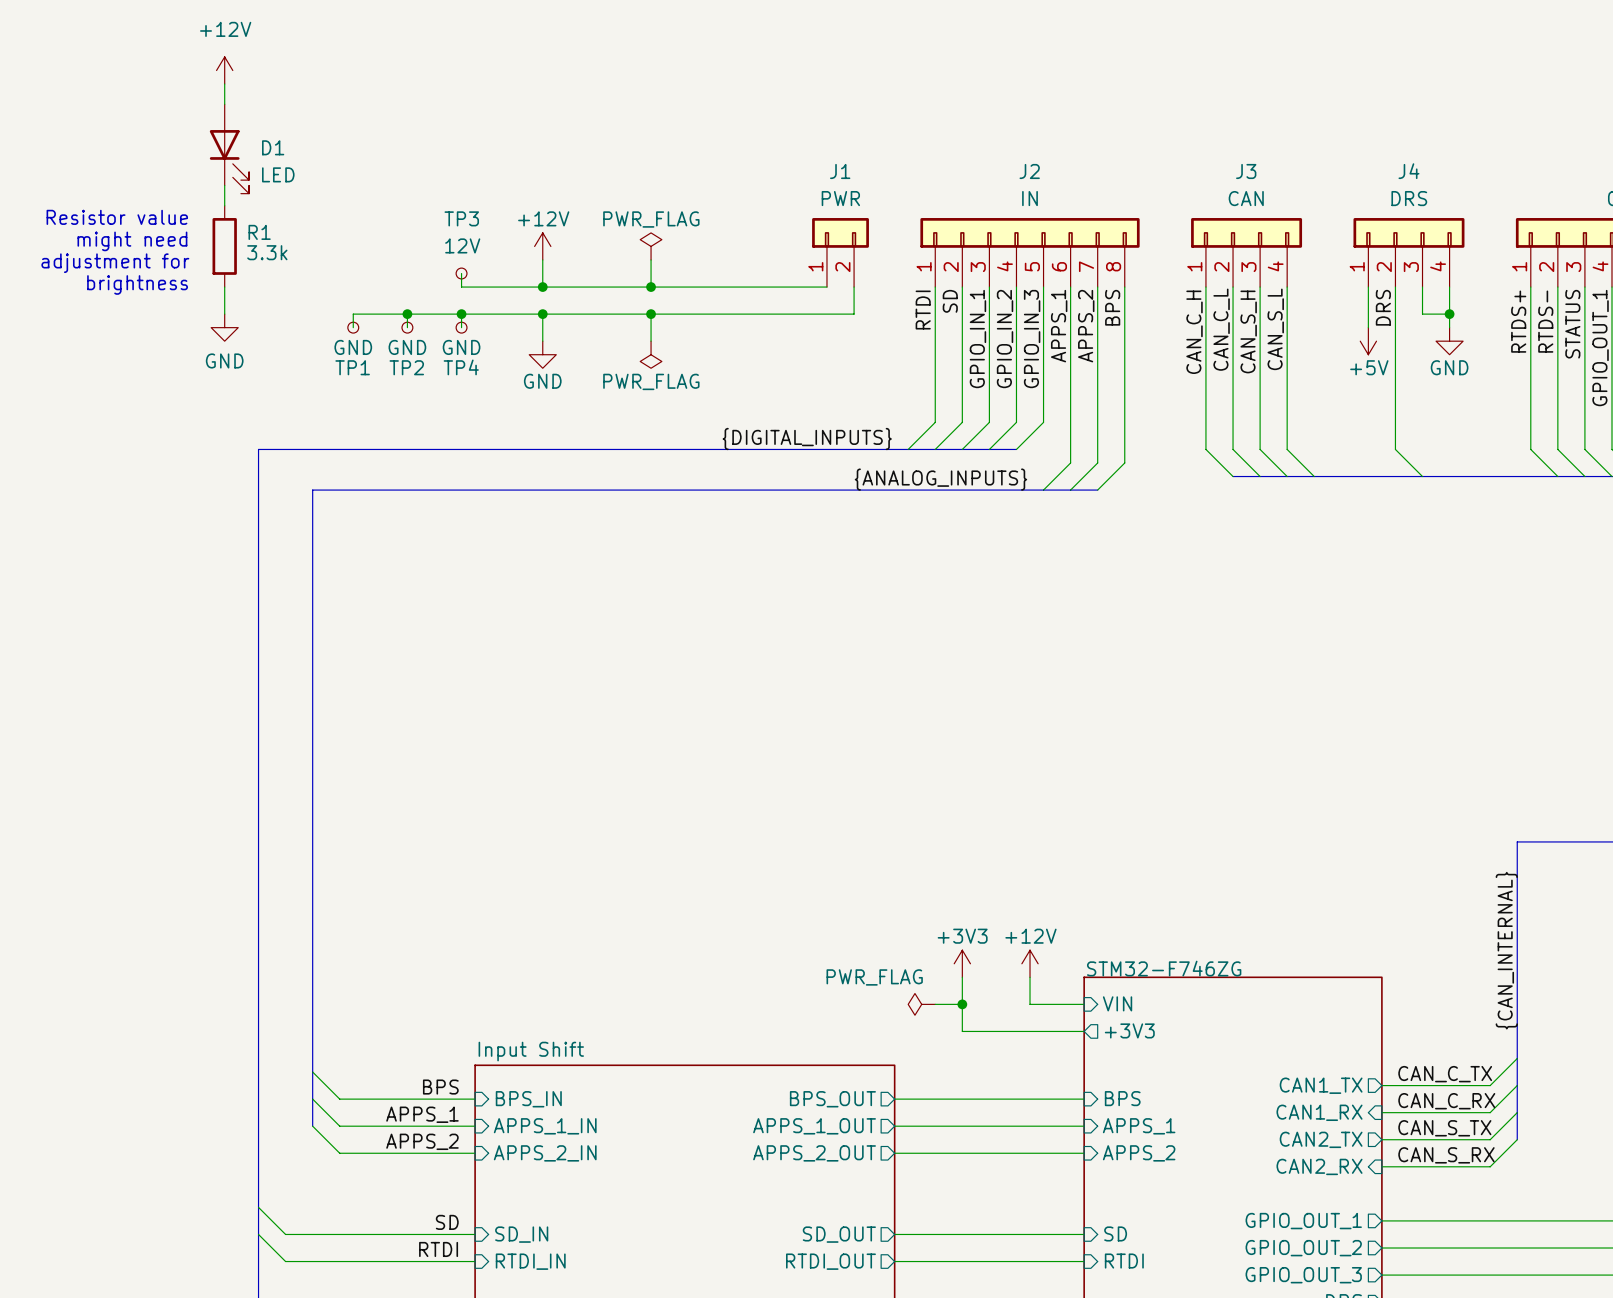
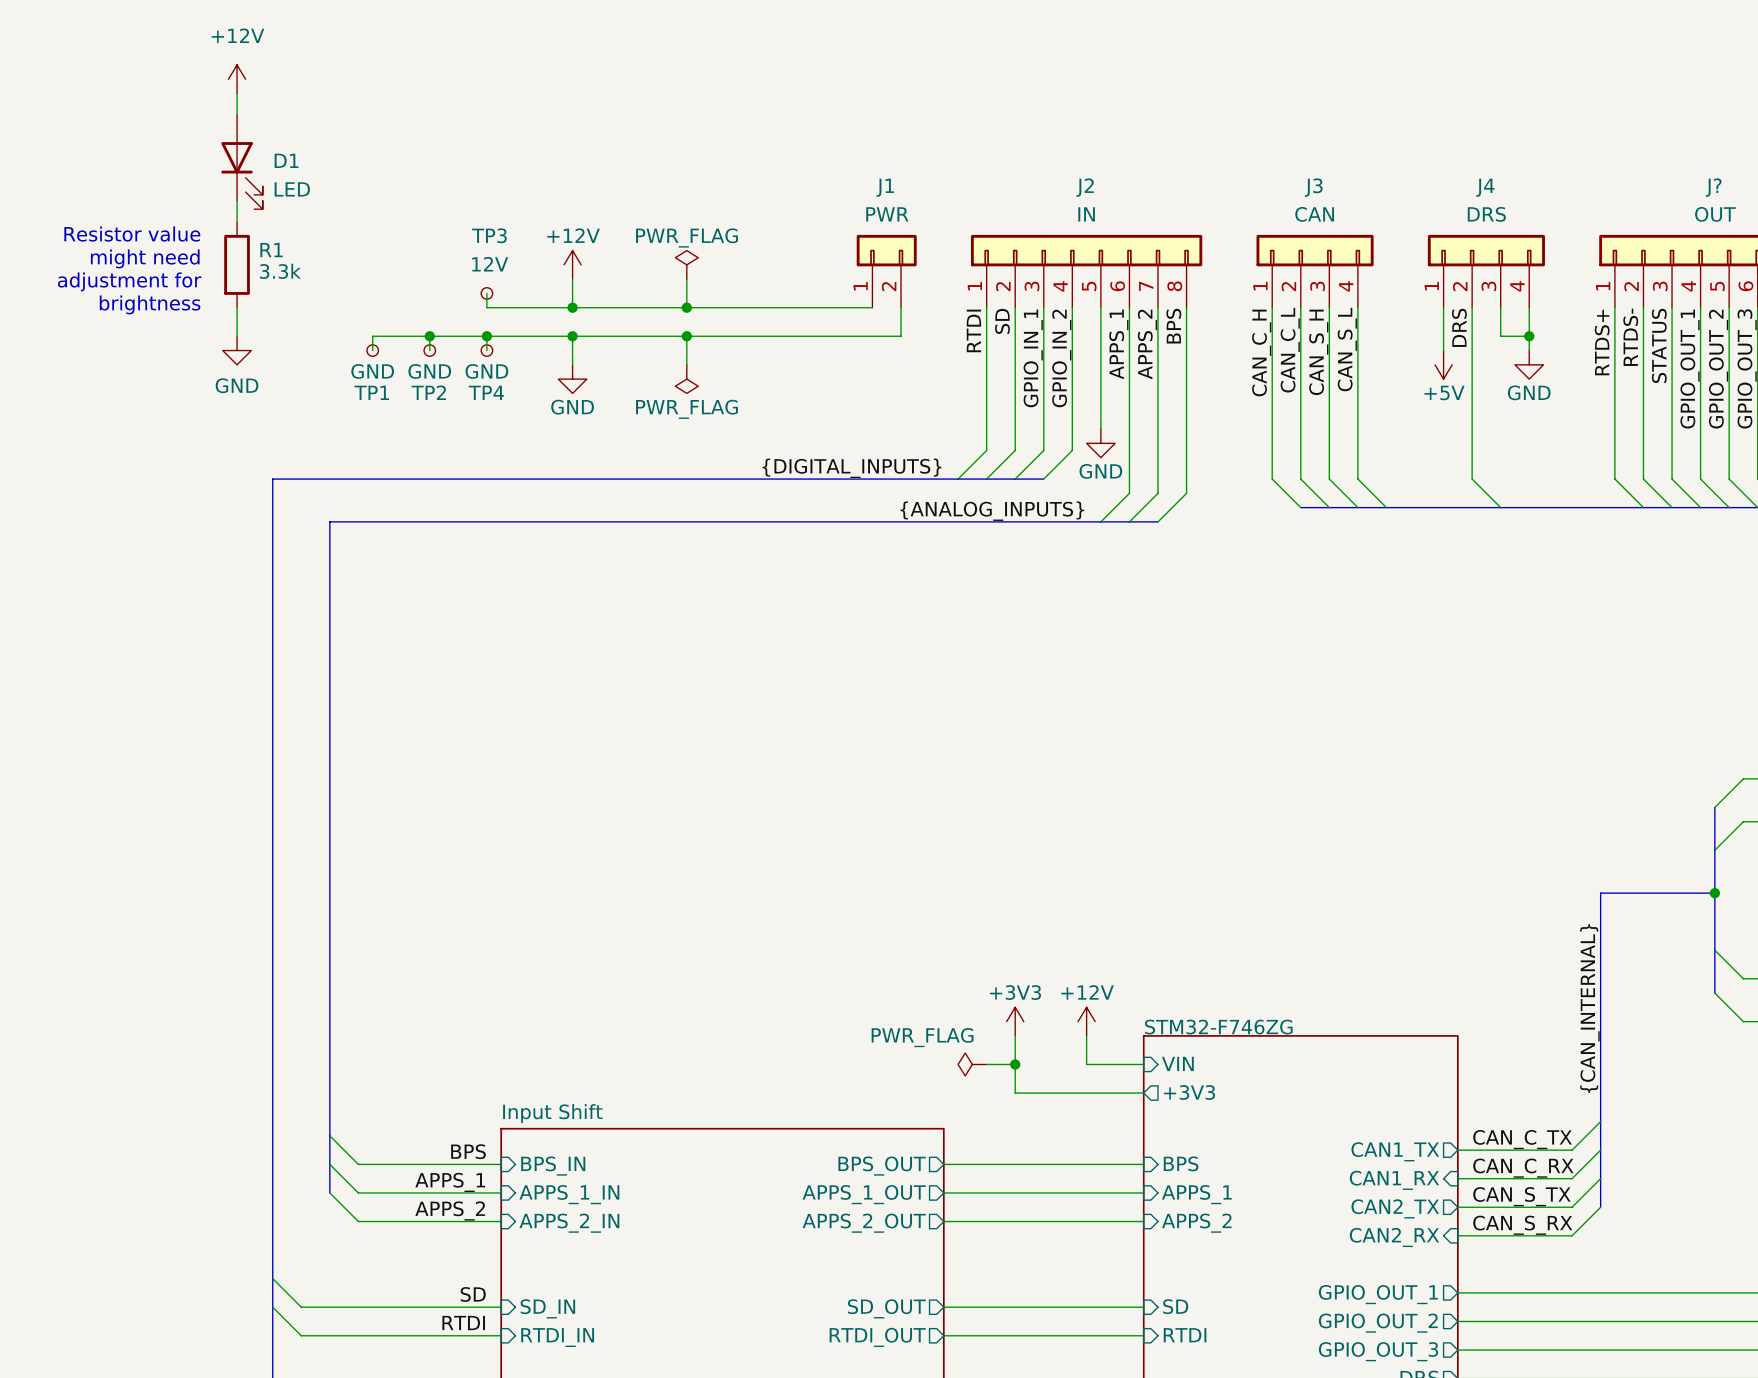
label: GPIO_IN_3 (1032, 339) -> none
wire: (1043, 402) (1043, 422) (1016, 449) -> none
power symbol: none -> GND (1100, 443)
bus: (989, 449) (1016, 449) -> none

